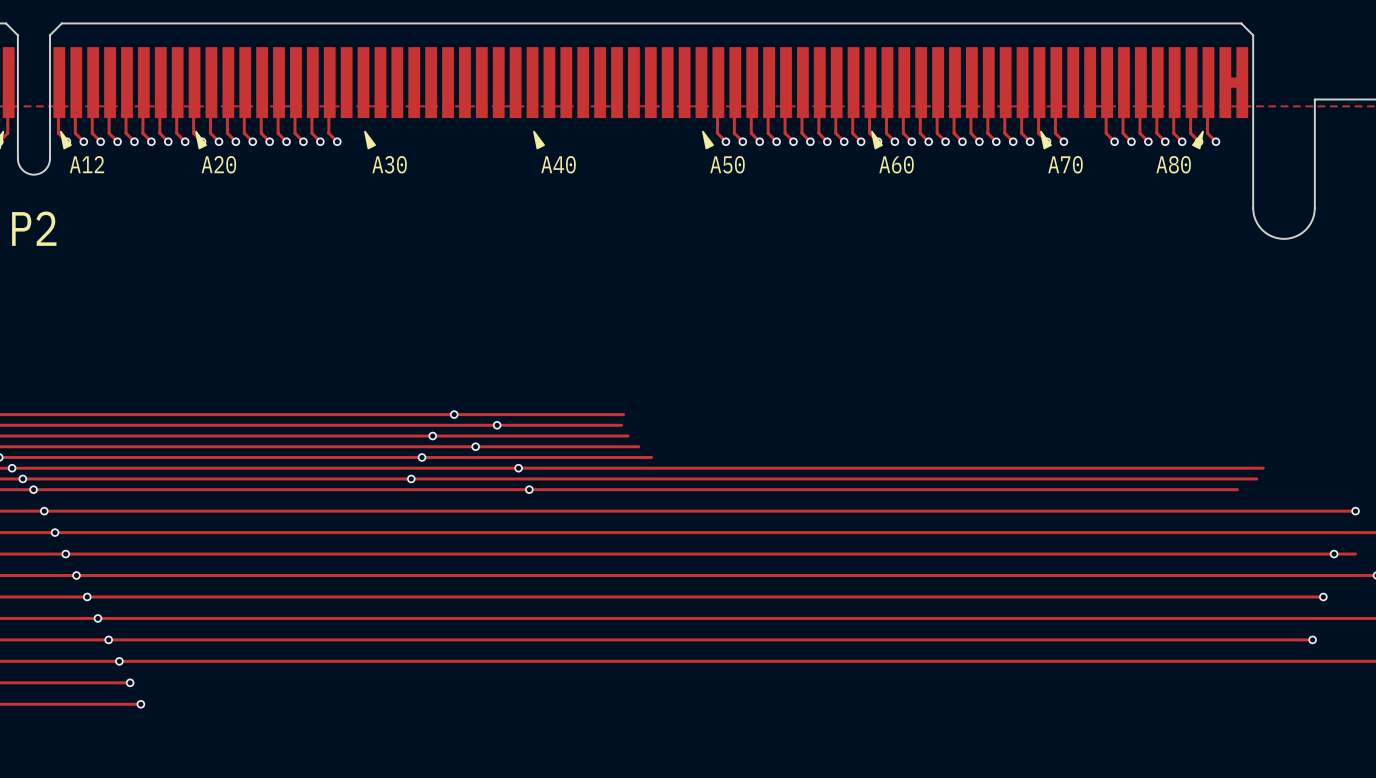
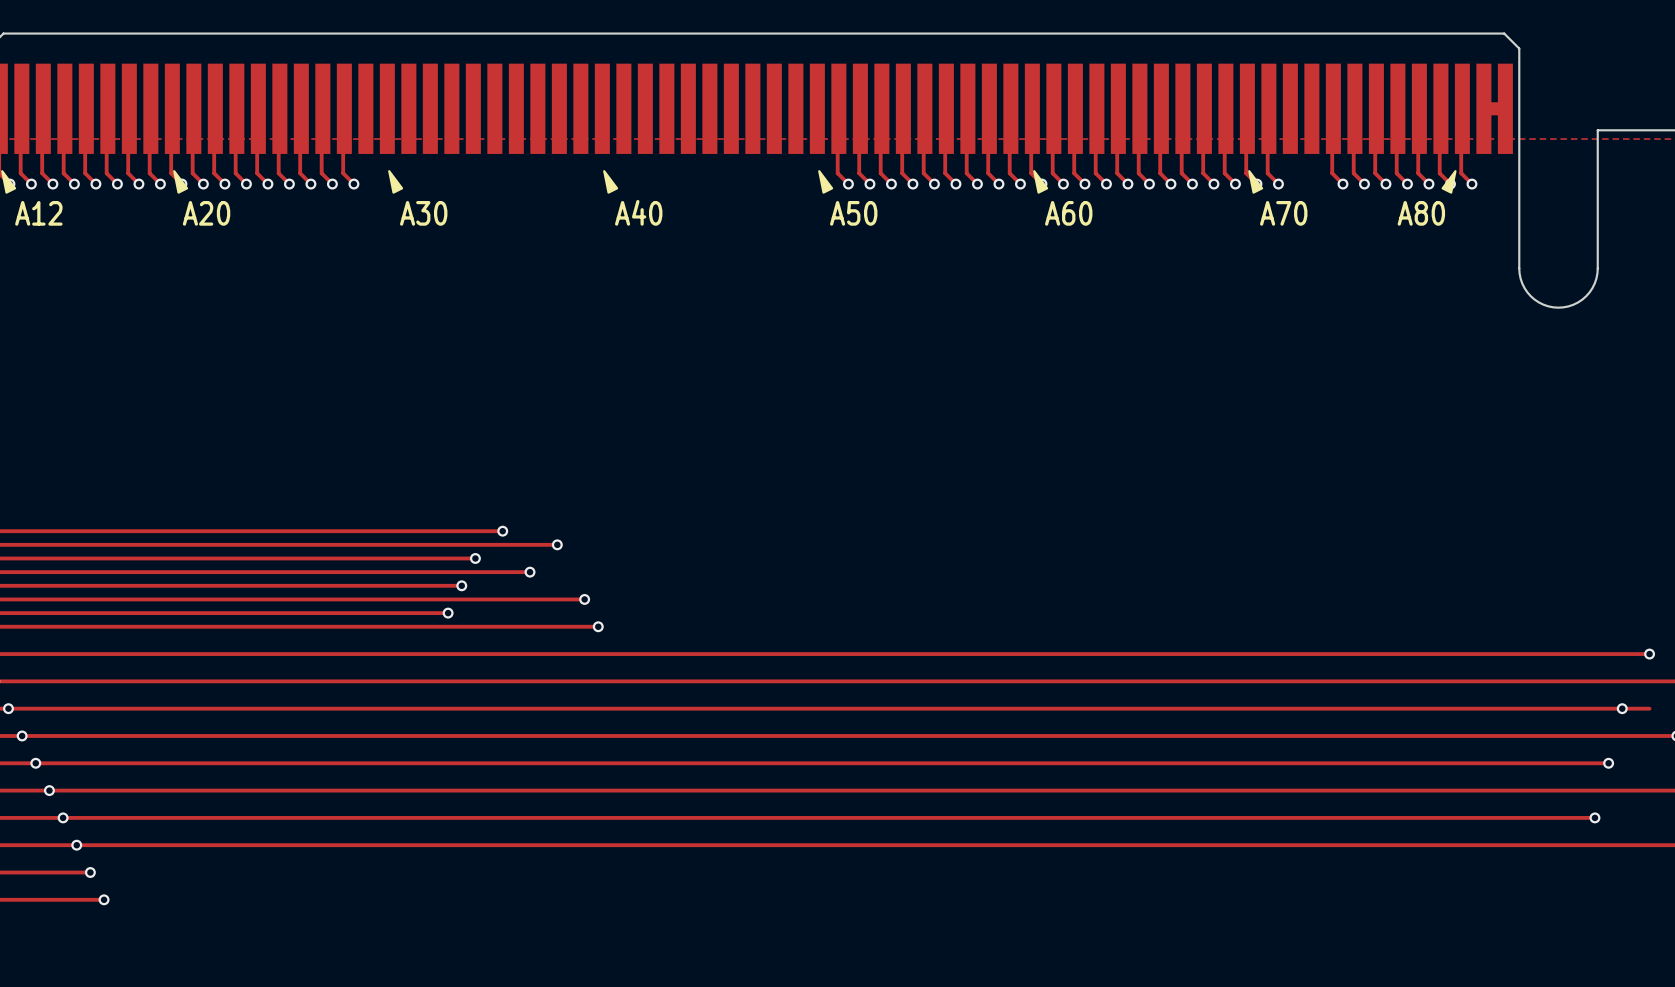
track: (454, 414) (623, 414) -> none
track: (497, 425) (621, 425) -> none
track: (432, 436) (628, 436) -> none
track: (475, 446) (638, 446) -> none
track: (422, 457) (651, 457) -> none
track: (518, 468) (1263, 468) -> none
track: (411, 478) (1256, 478) -> none
track: (529, 489) (1237, 489) -> none

